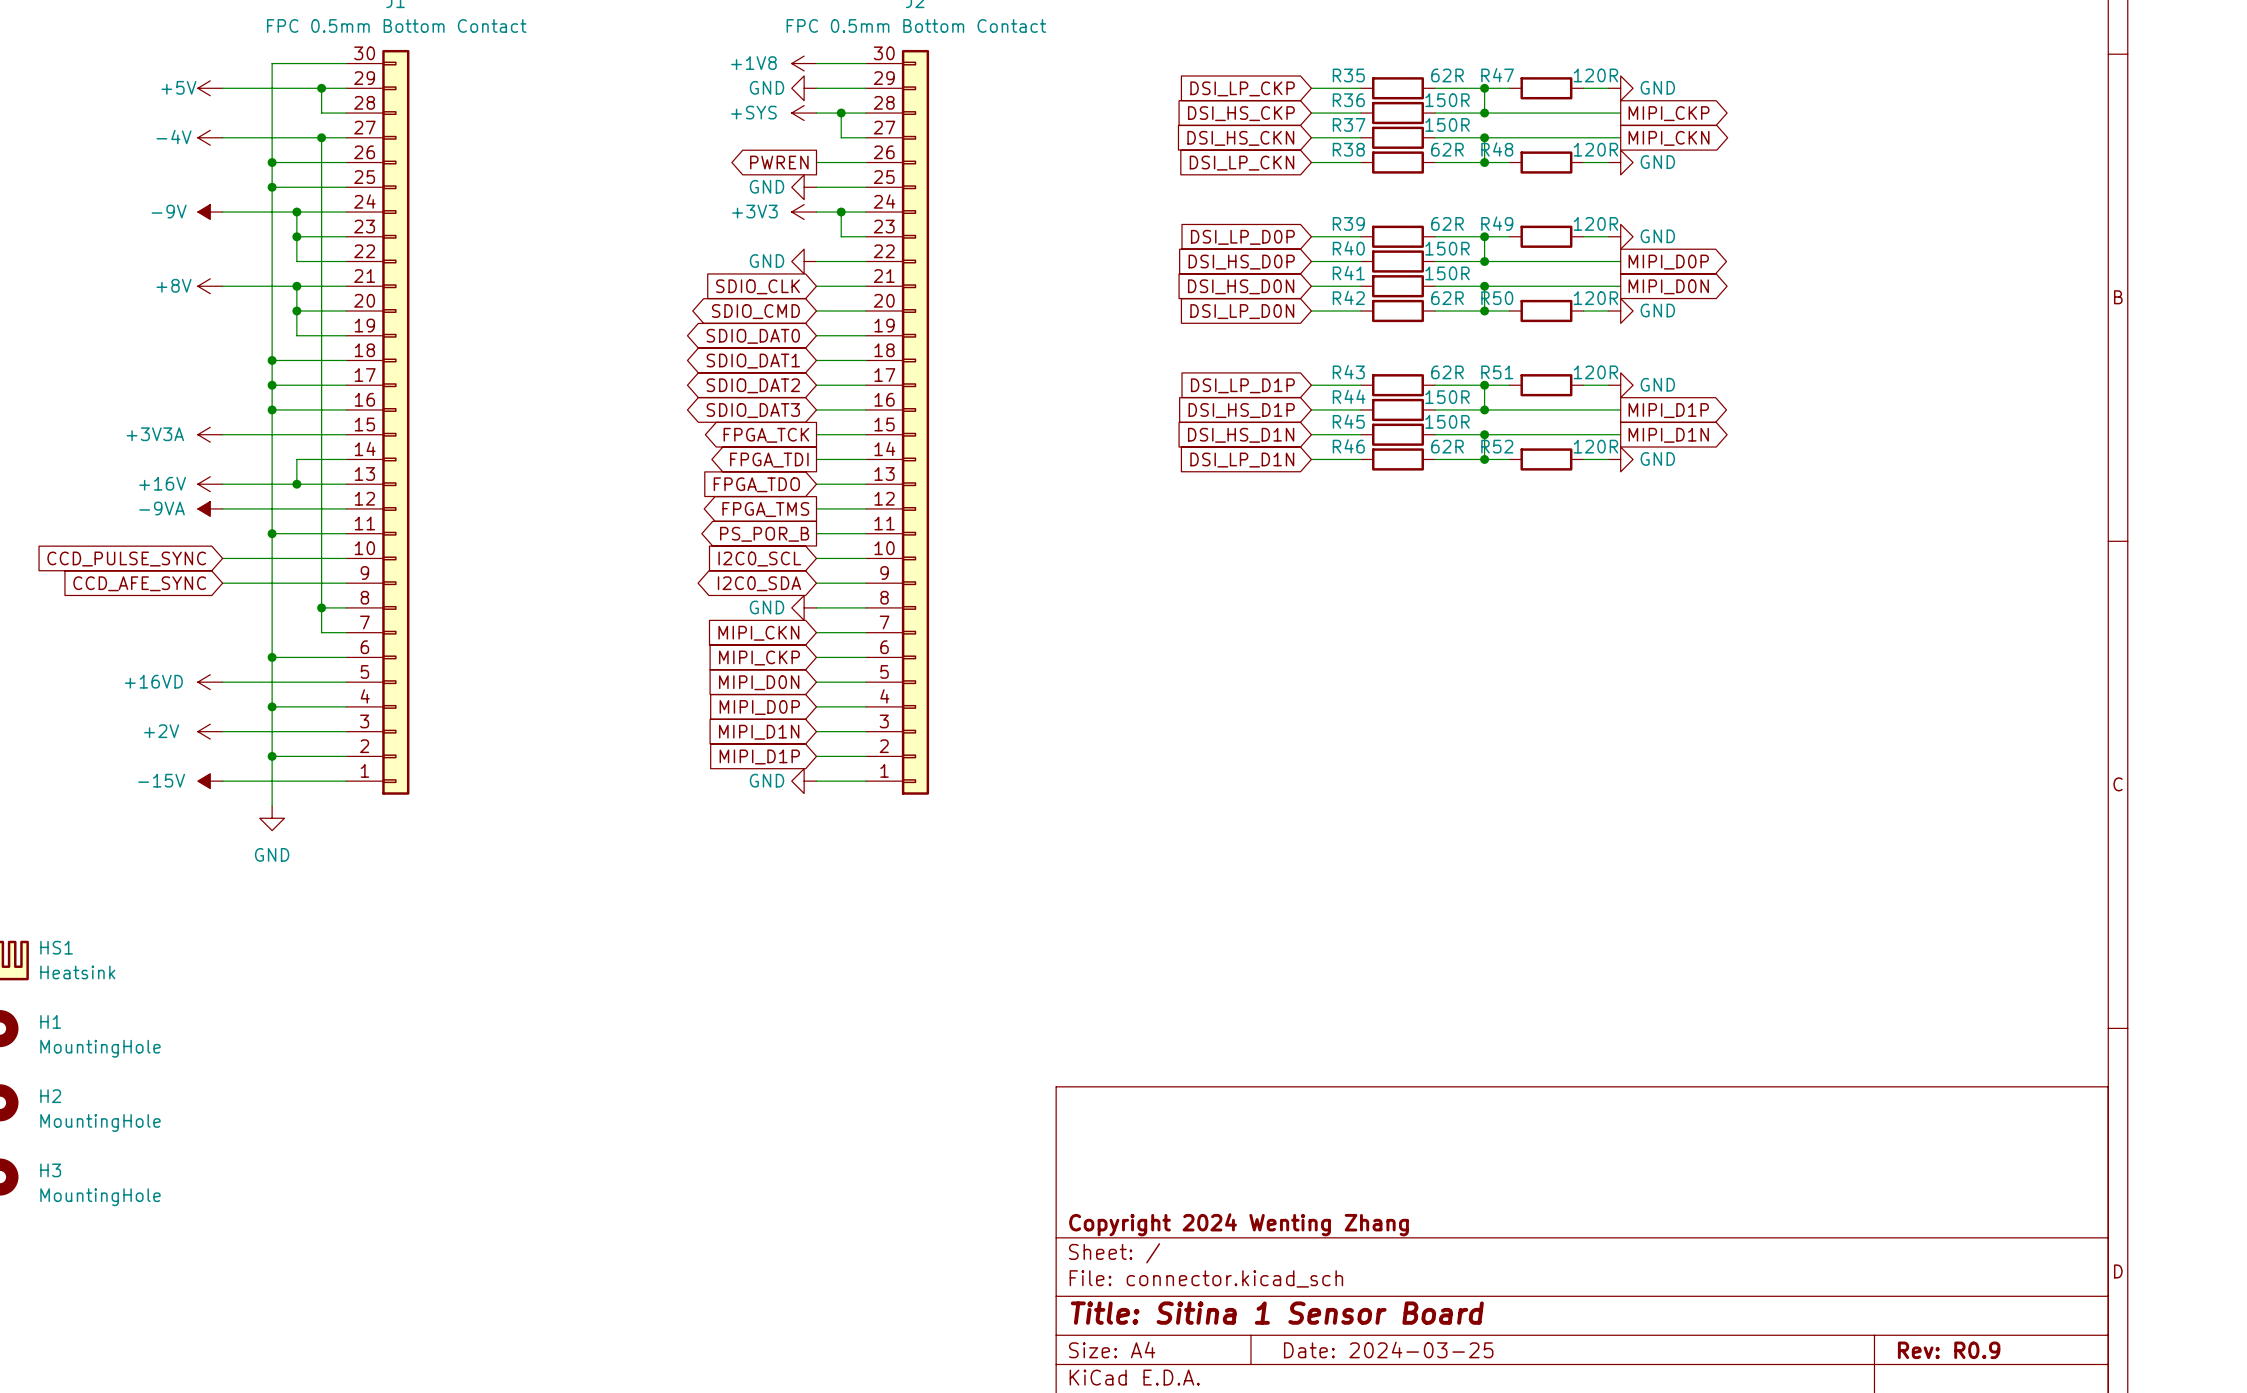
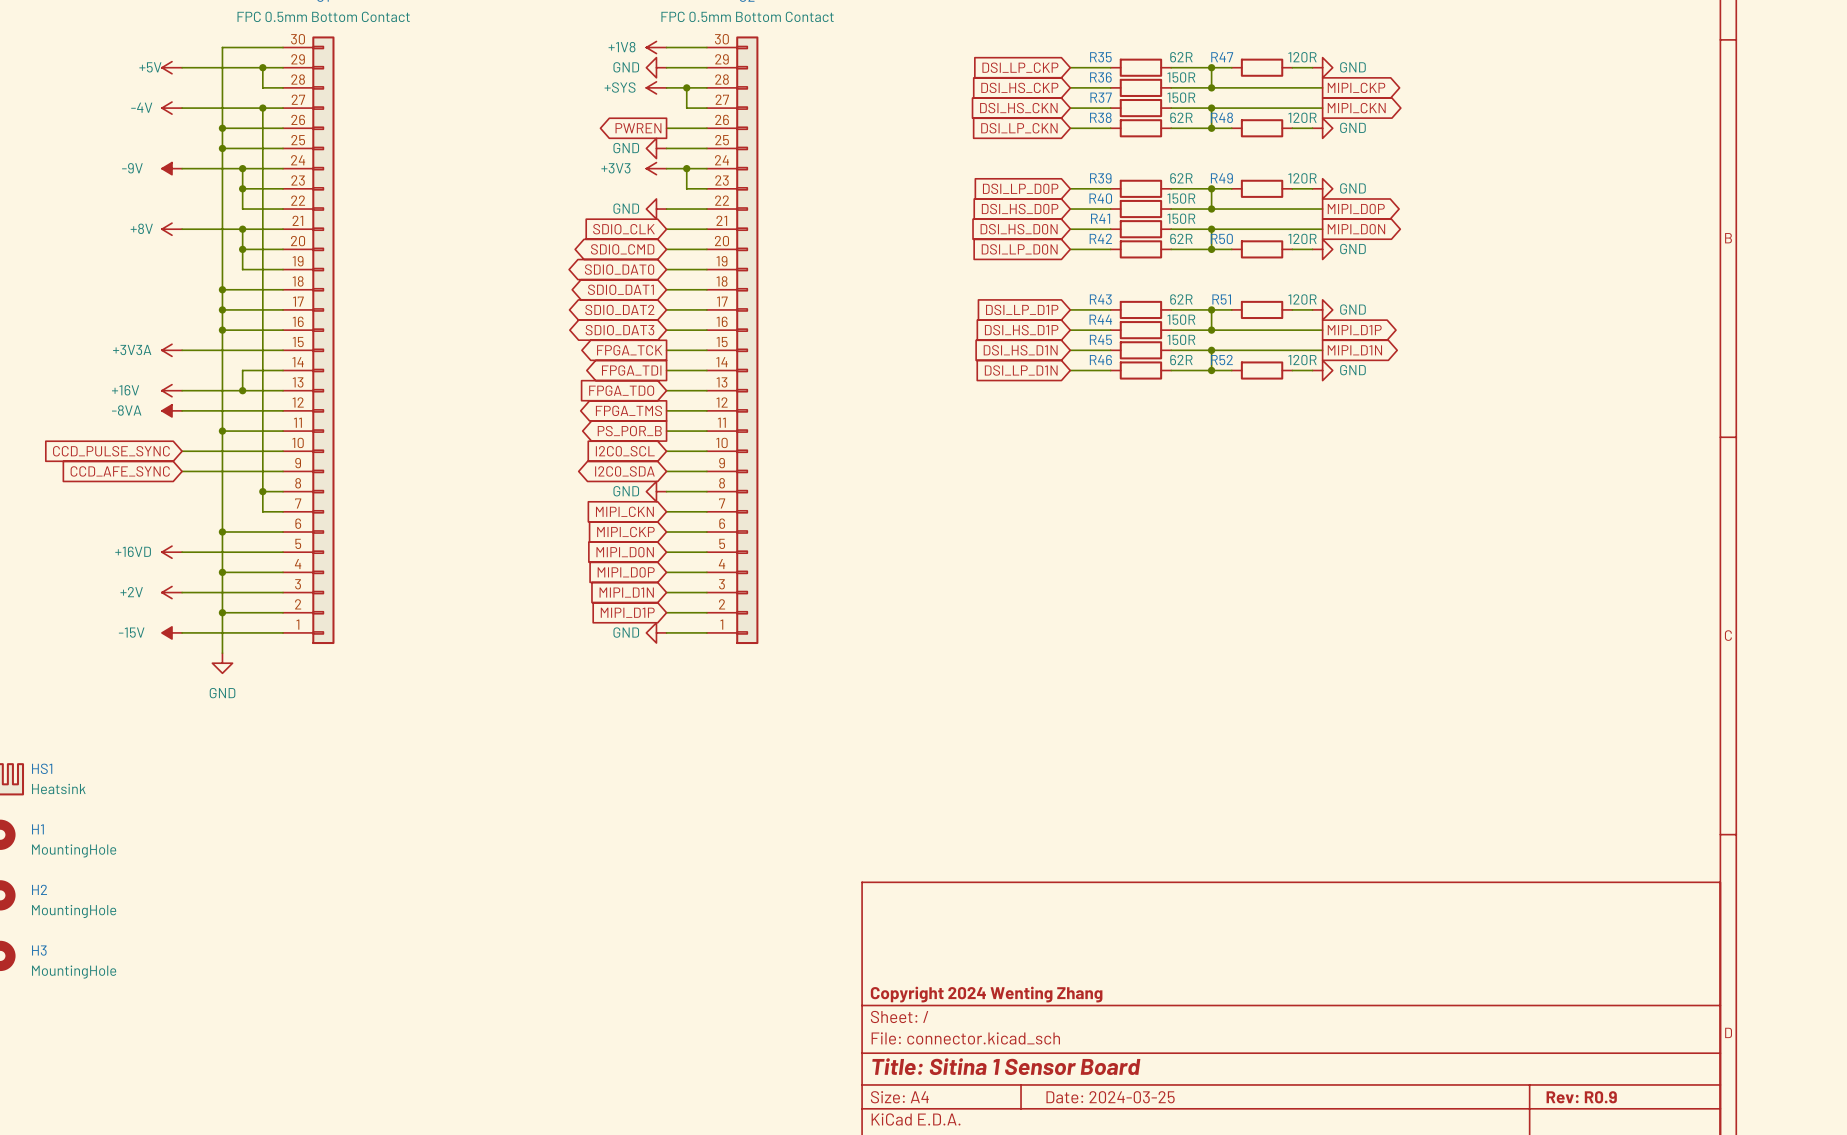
power symbol: -9VA (210, 508) -> -8VA (171, 410)

